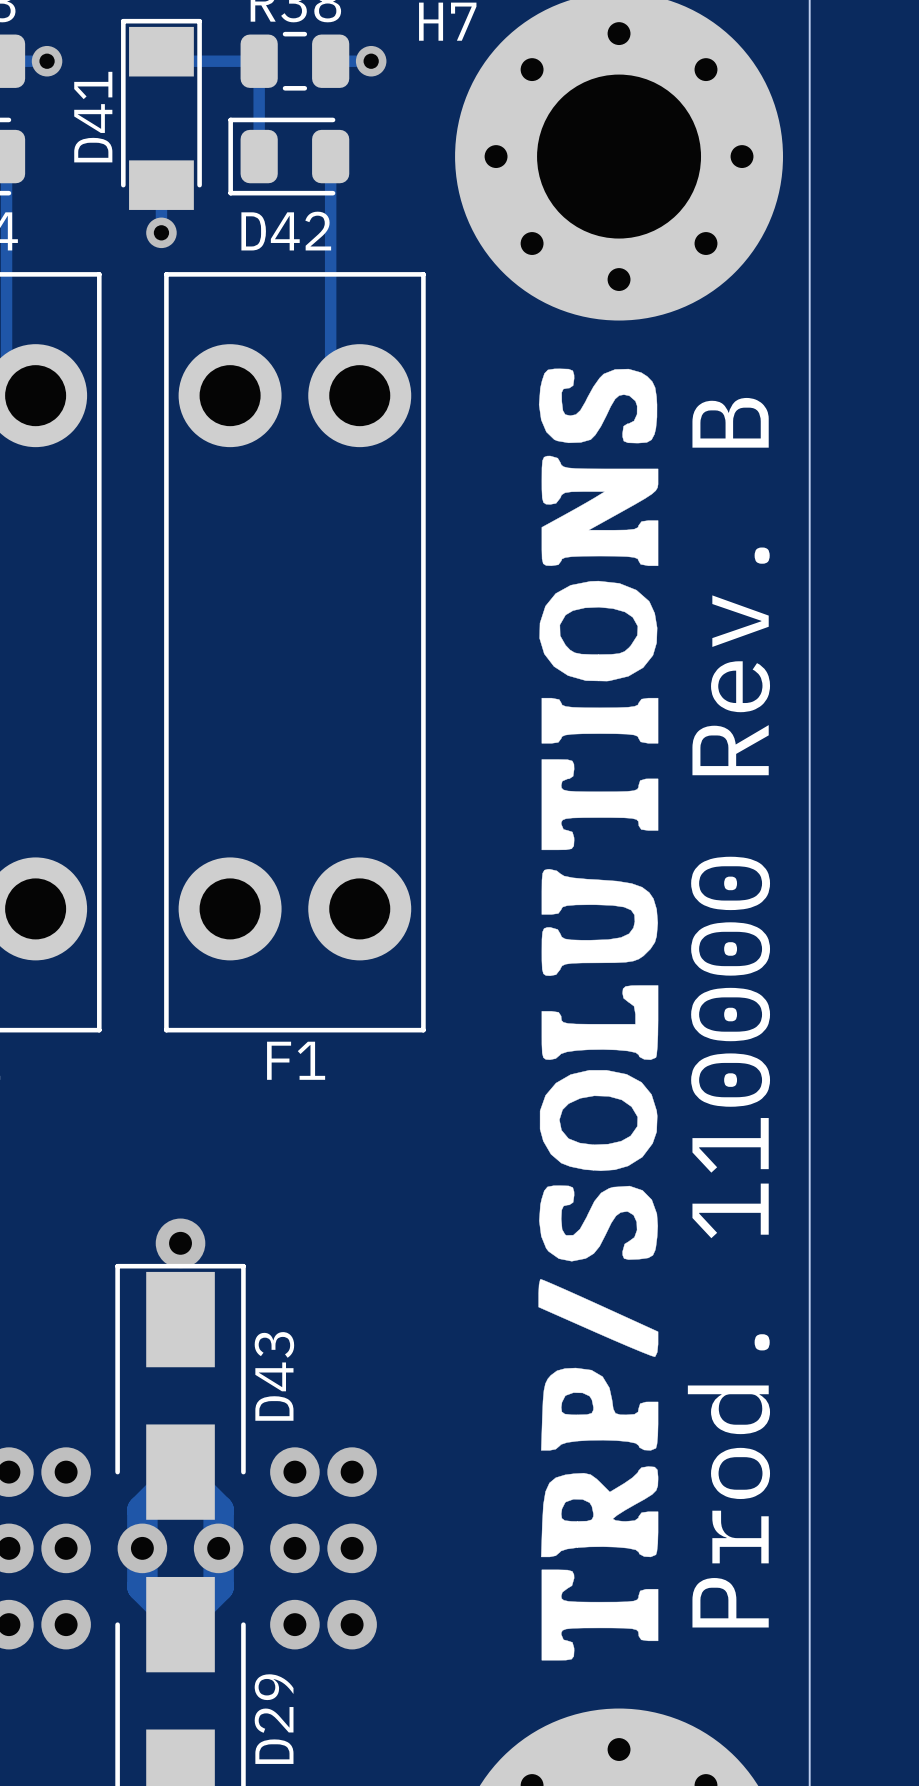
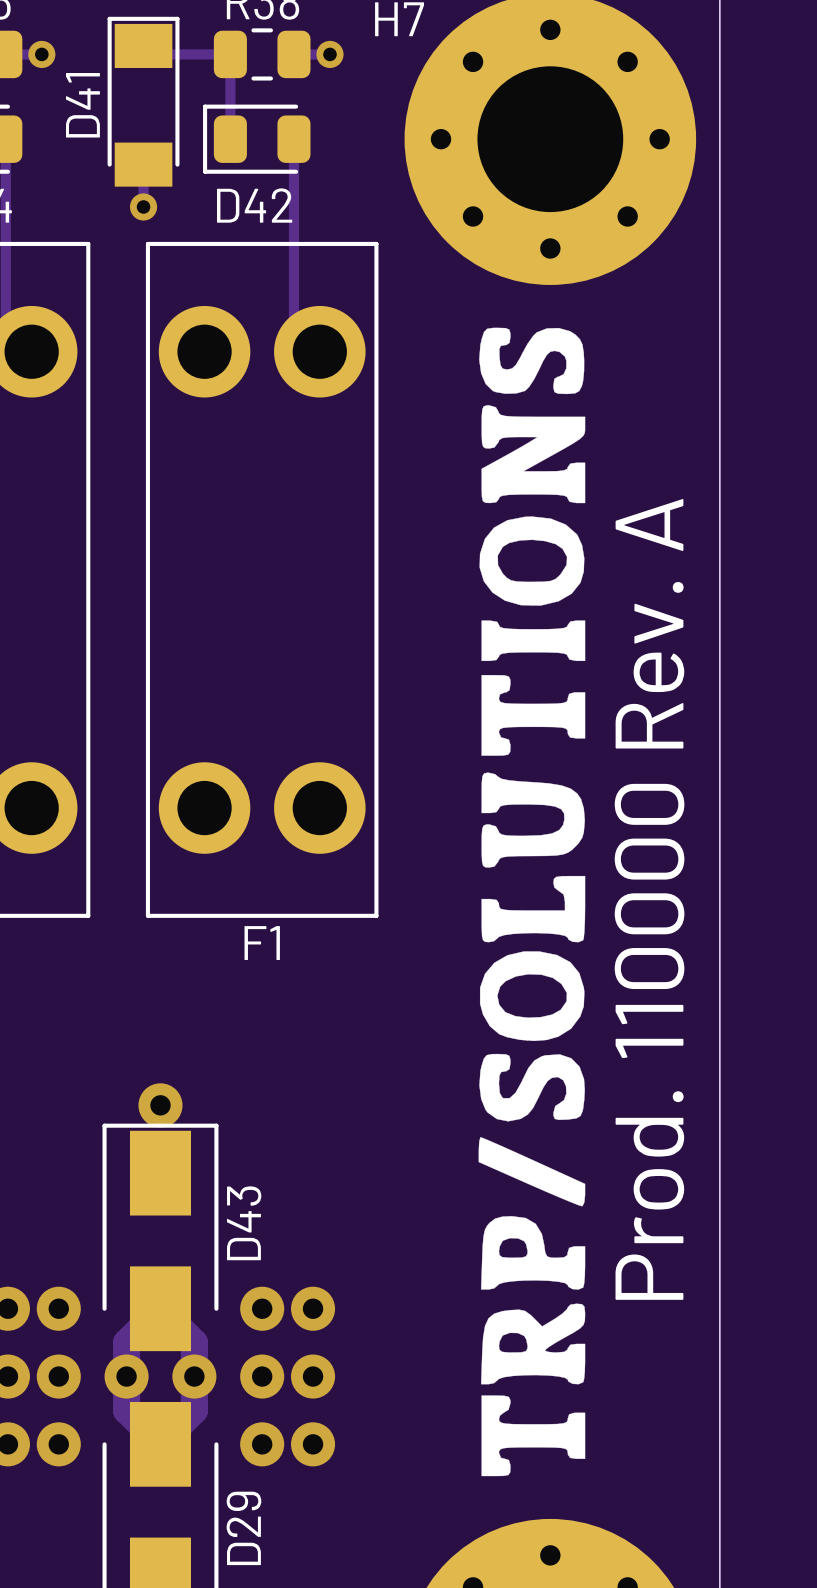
text: Prod. 110000 Rev. B (728, 1012) -> Prod. 110000 Rev. A (649, 899)

